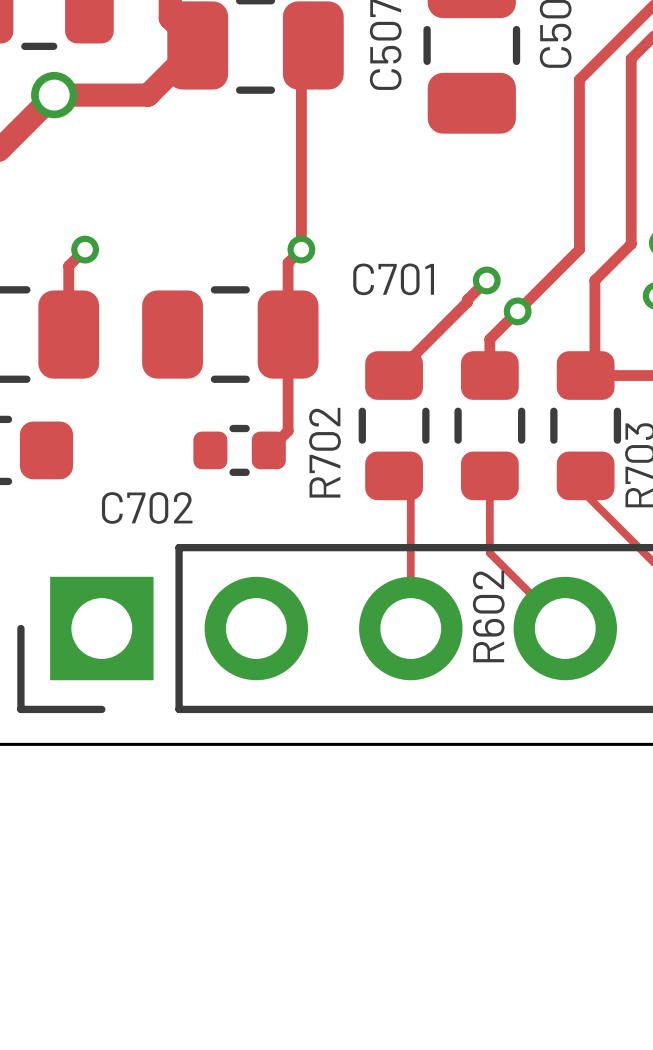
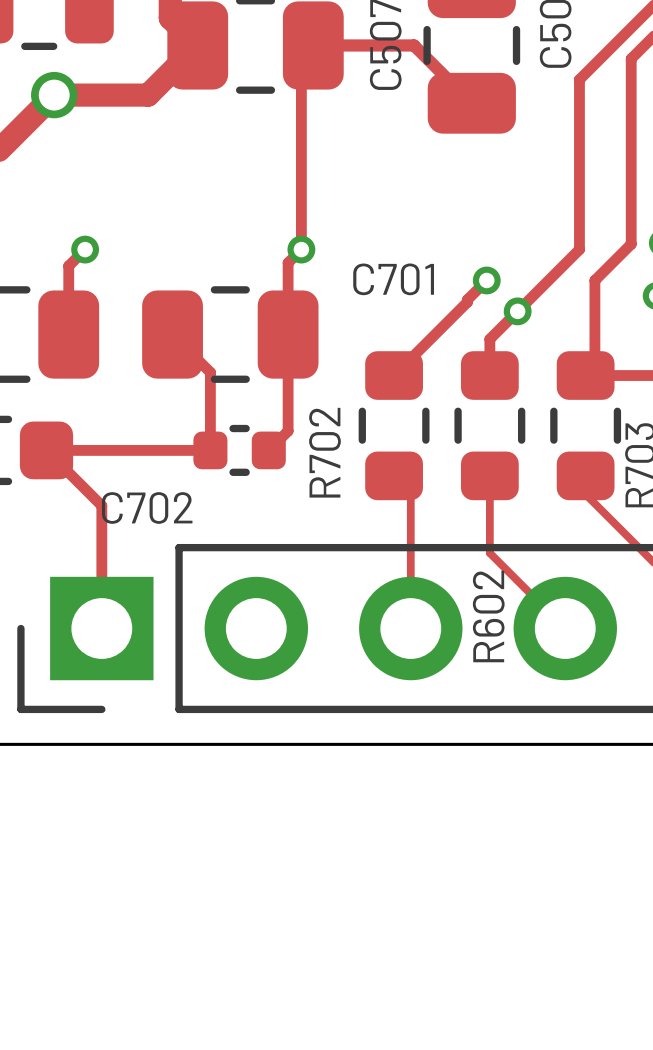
track: none -> (313, 45) (414, 45) (471, 103)
track: none -> (172, 334) (210, 372) (210, 450) (46, 450) (101, 505) (101, 628)

